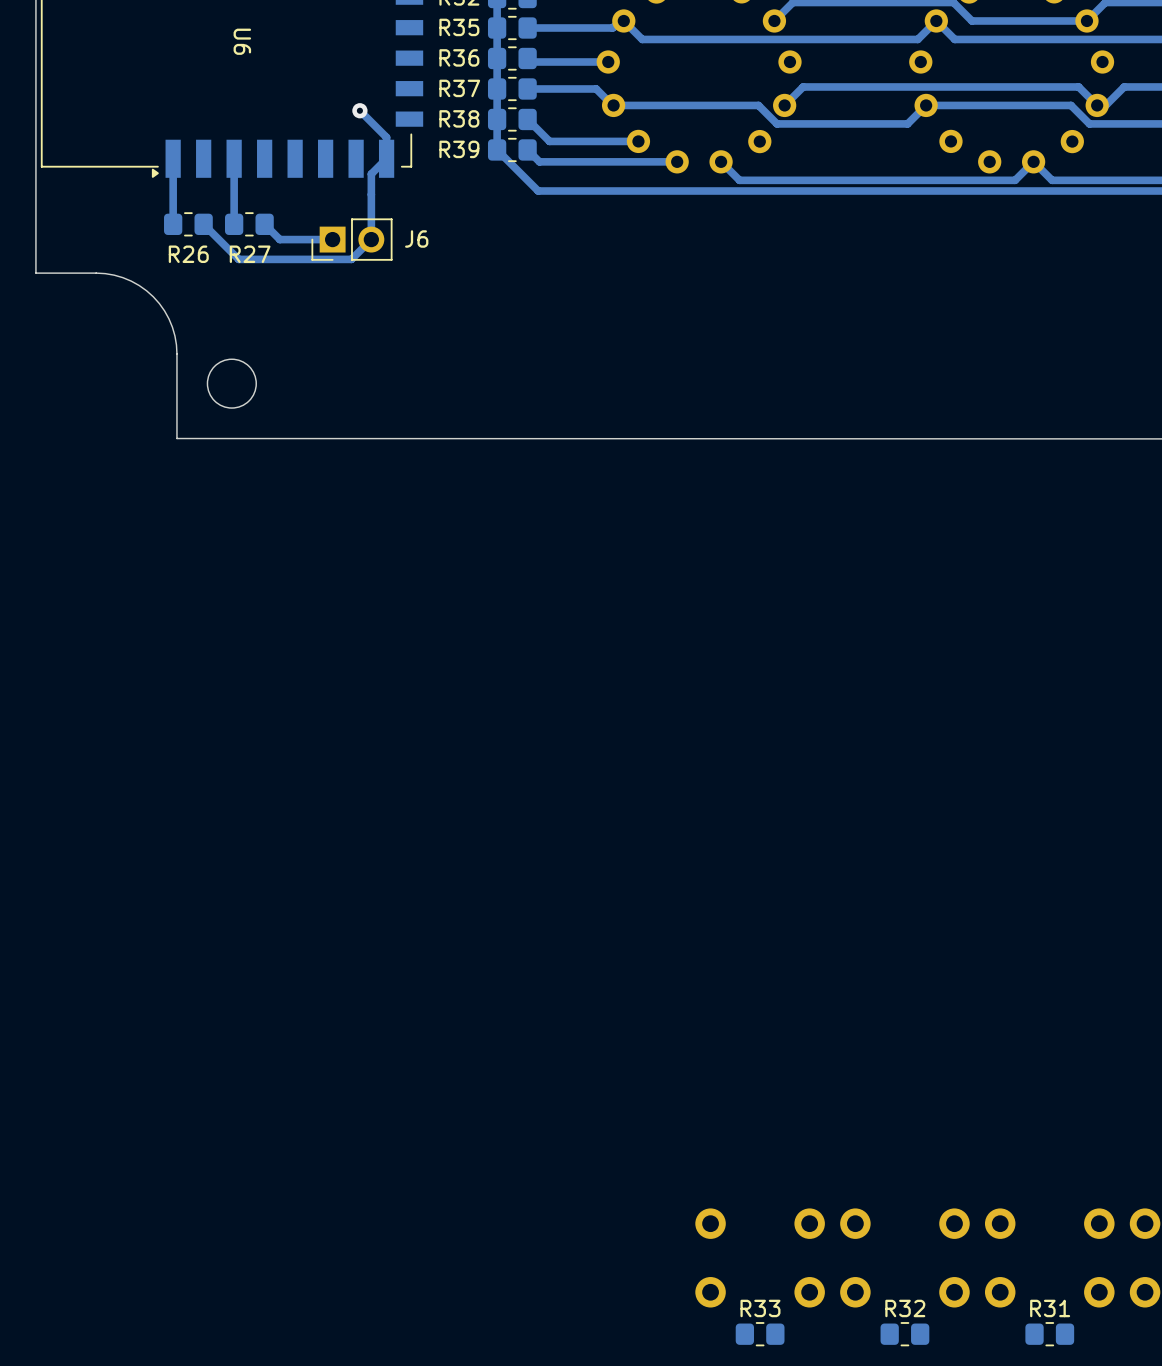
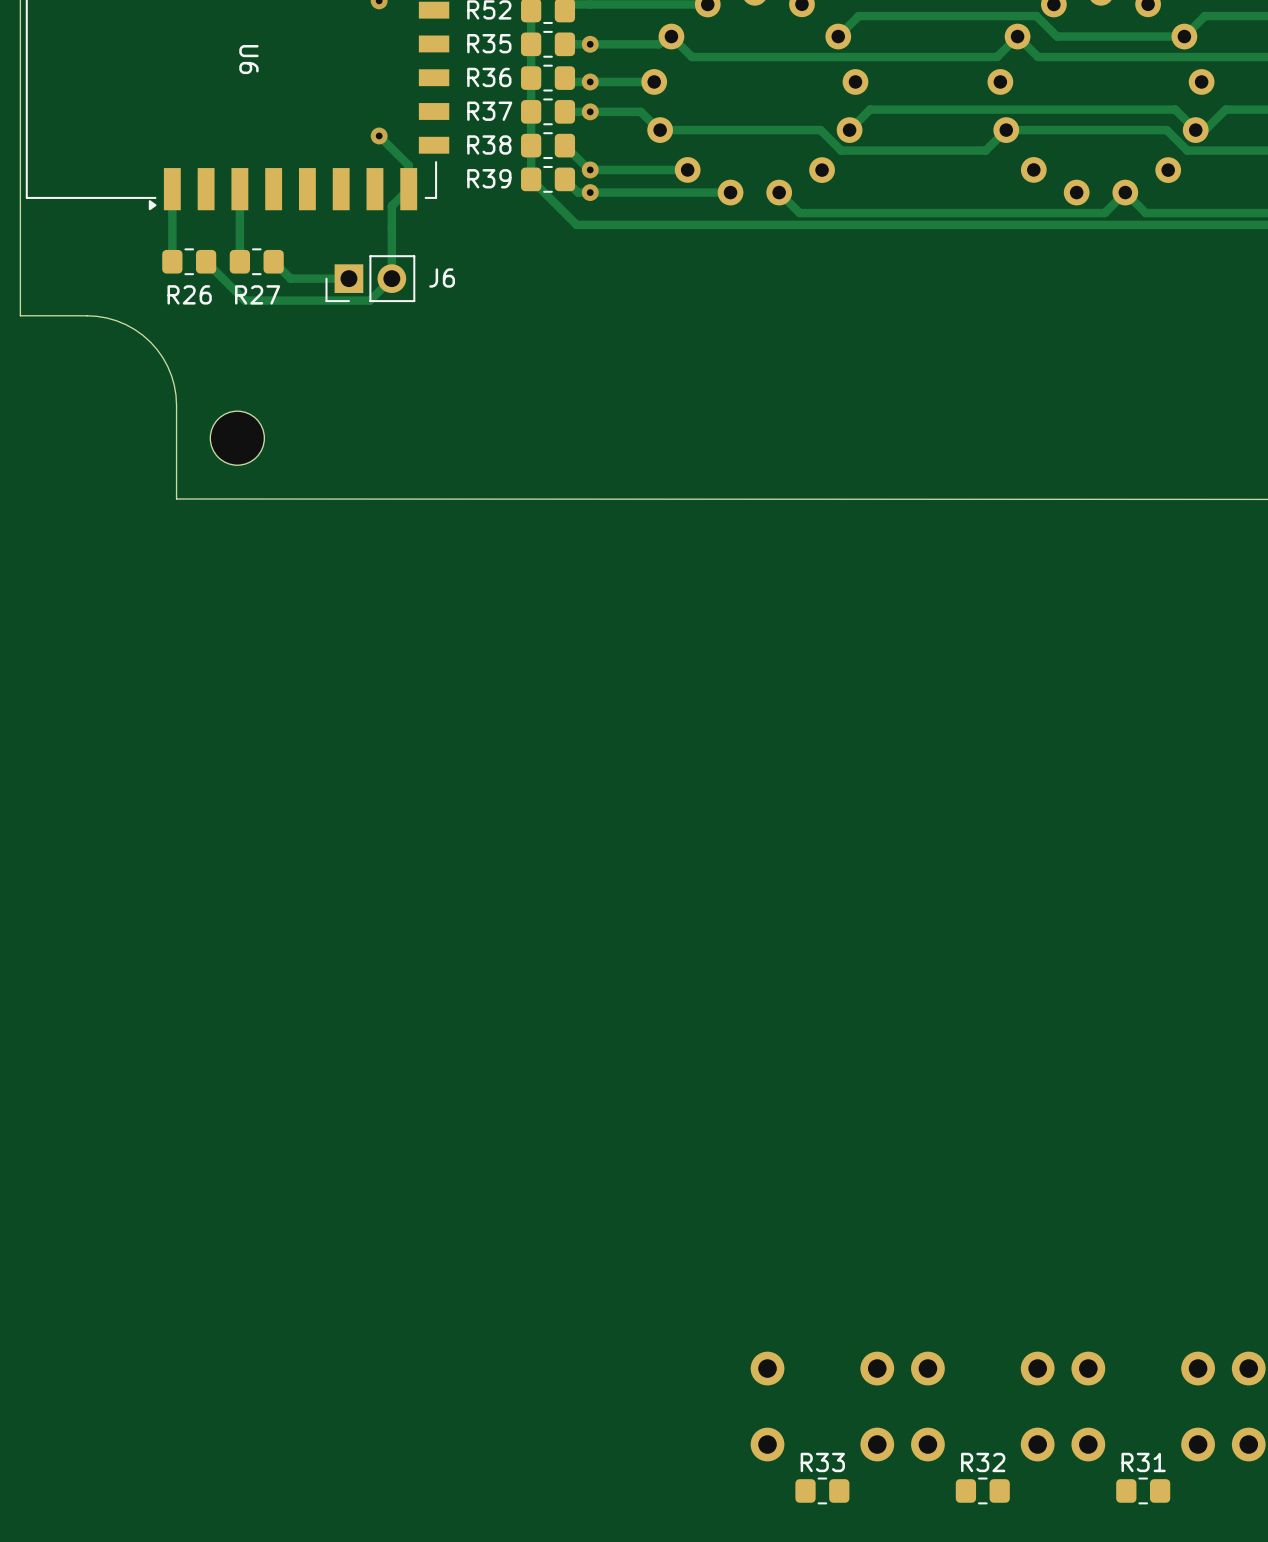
via: none -> (590, 44)
via: none -> (590, 81)
via: none -> (590, 111)
via: none -> (590, 169)
via: none -> (590, 192)

